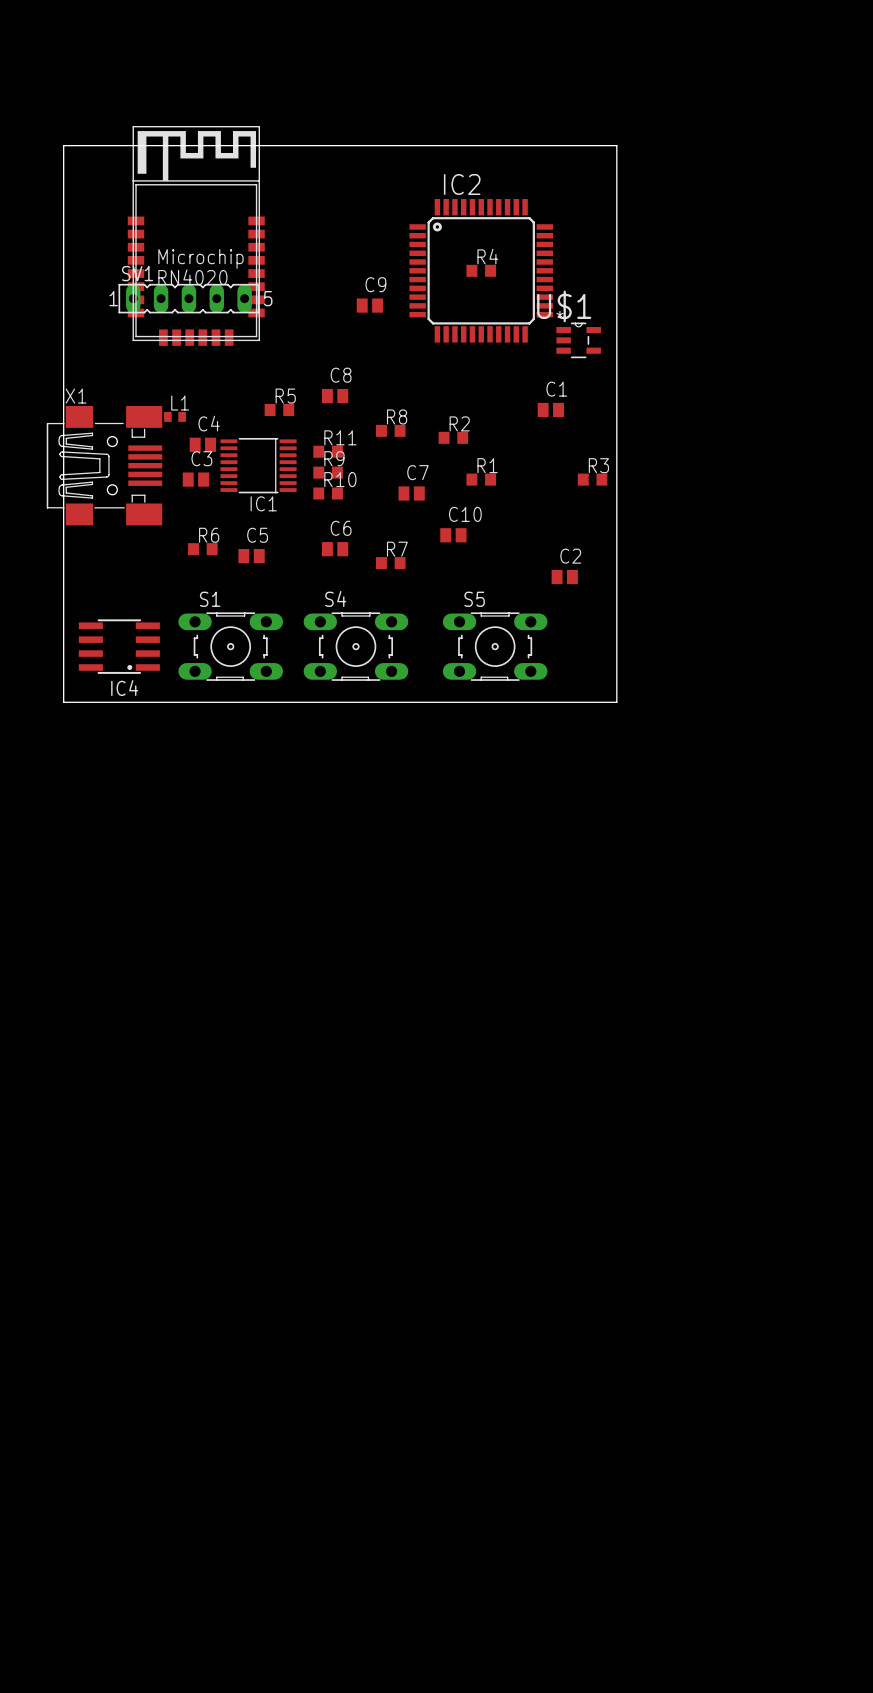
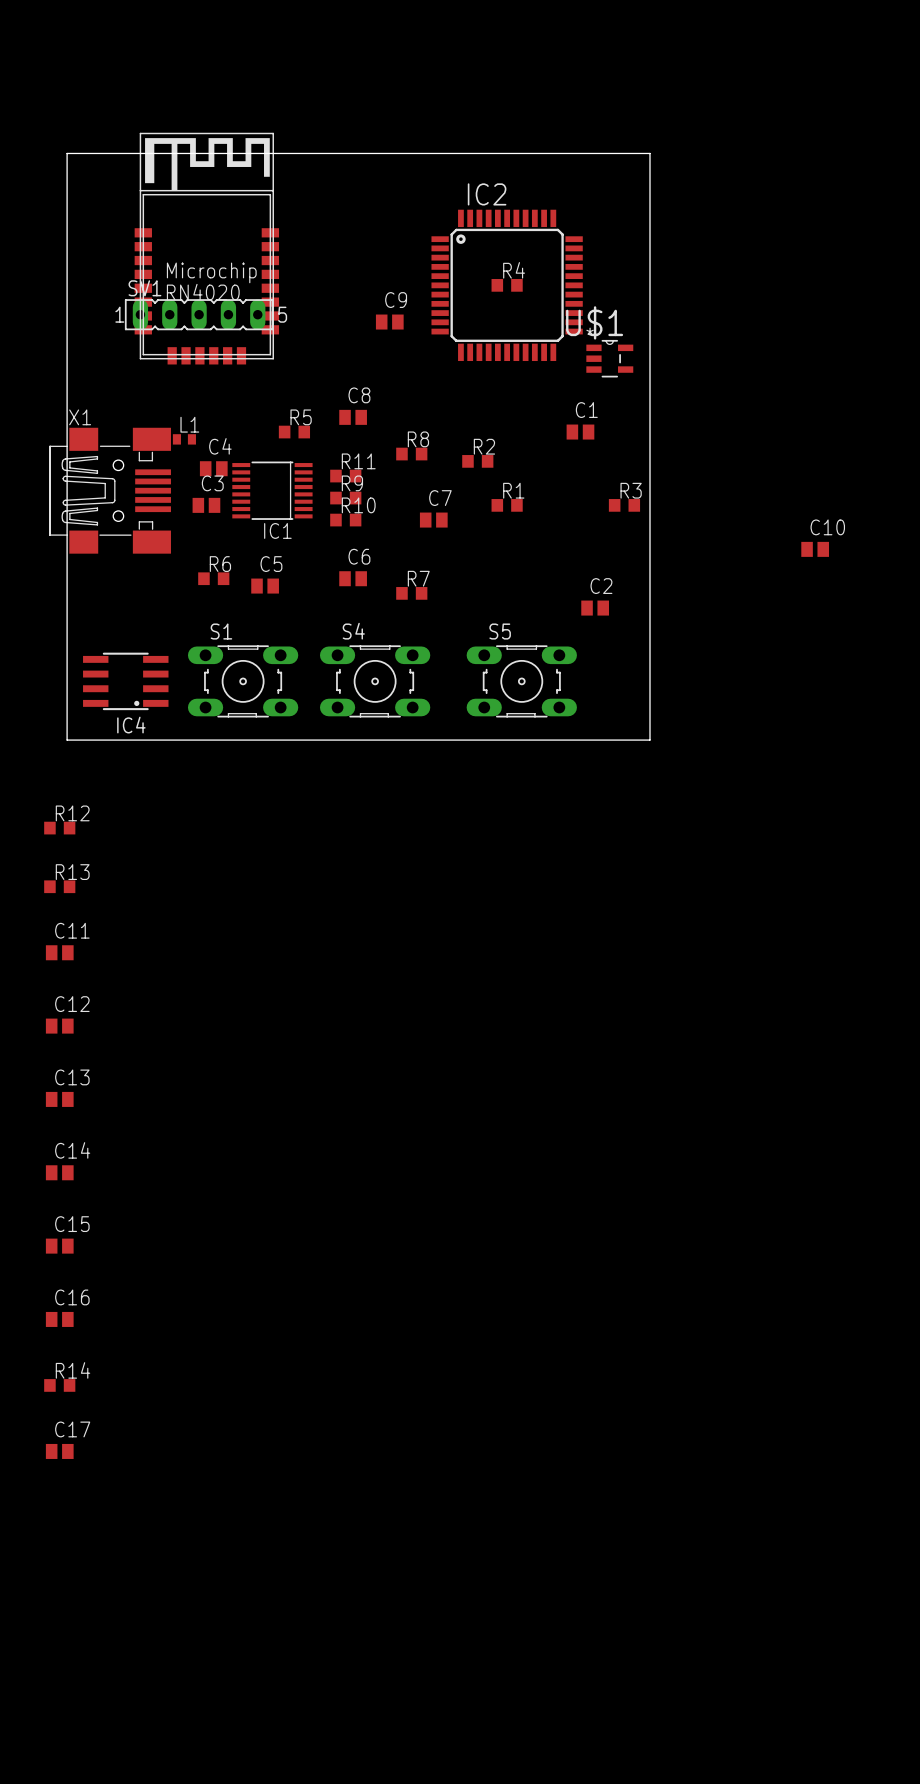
C10 position: (453, 535) -> (815, 549)
R12: none -> (59, 828)
R13: none -> (59, 886)
C11: none -> (59, 952)
C12: none -> (59, 1026)
C13: none -> (59, 1099)
C14: none -> (59, 1172)
C15: none -> (59, 1246)
C16: none -> (59, 1319)
R14: none -> (59, 1385)
C17: none -> (59, 1451)

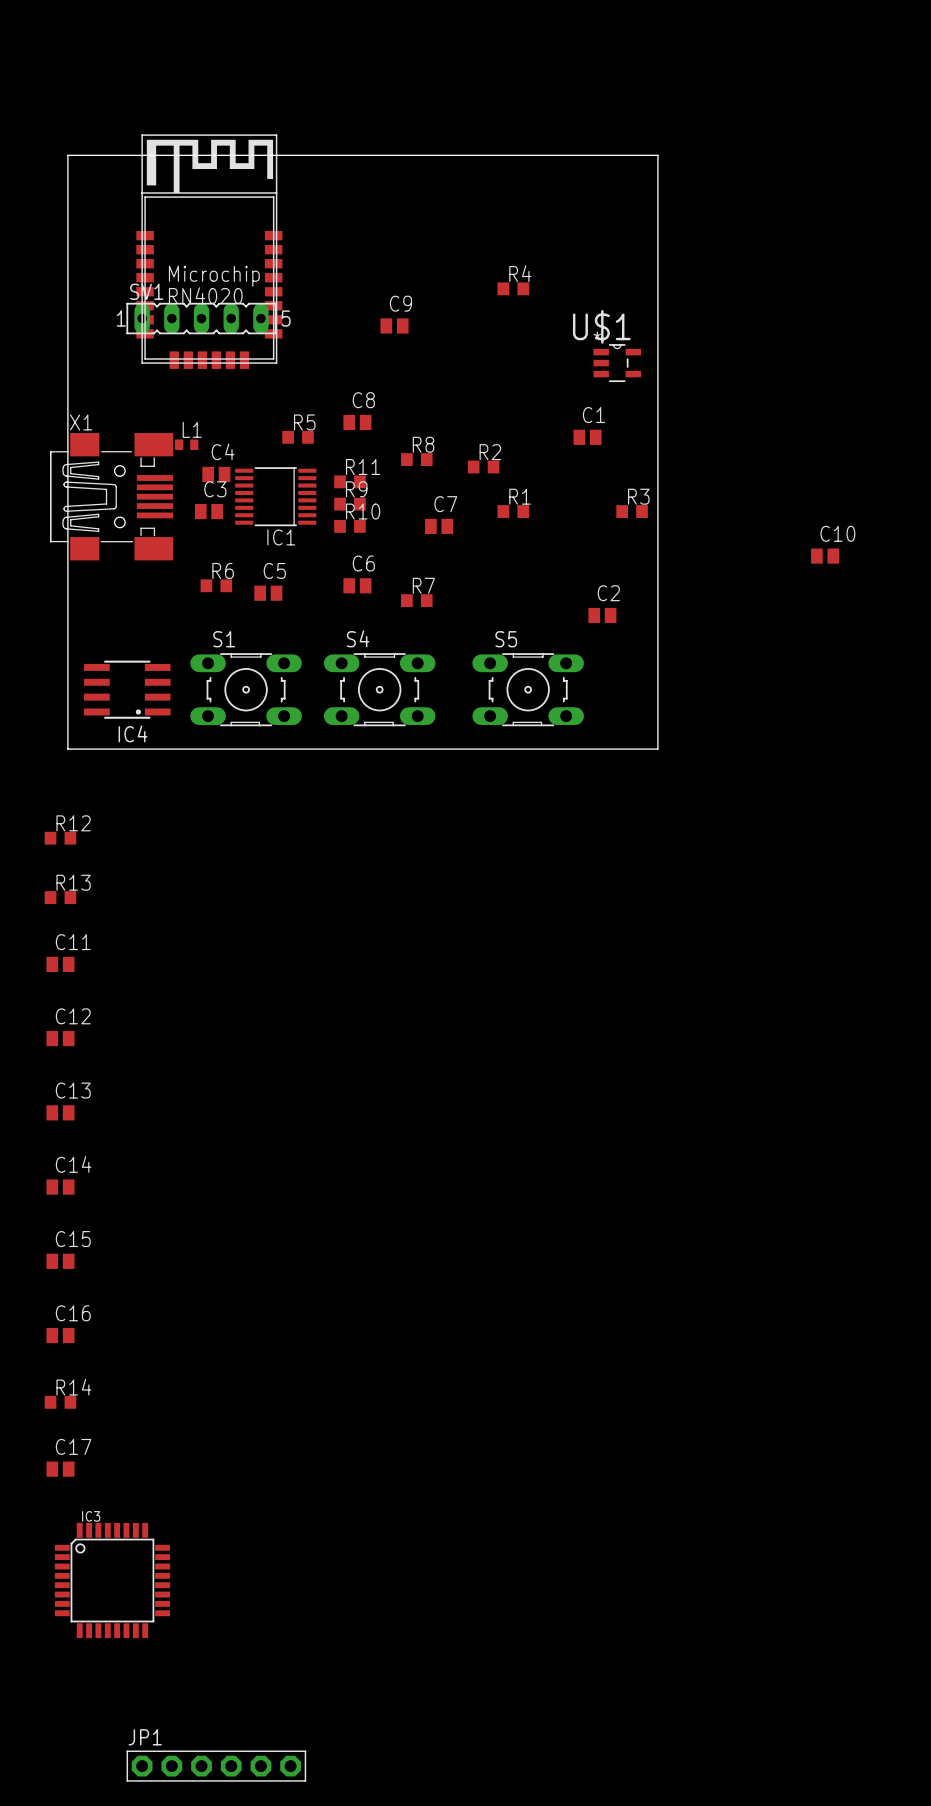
IC2: (507, 285) -> none
IC3: none -> (112, 1580)
JP1: none -> (216, 1766)

